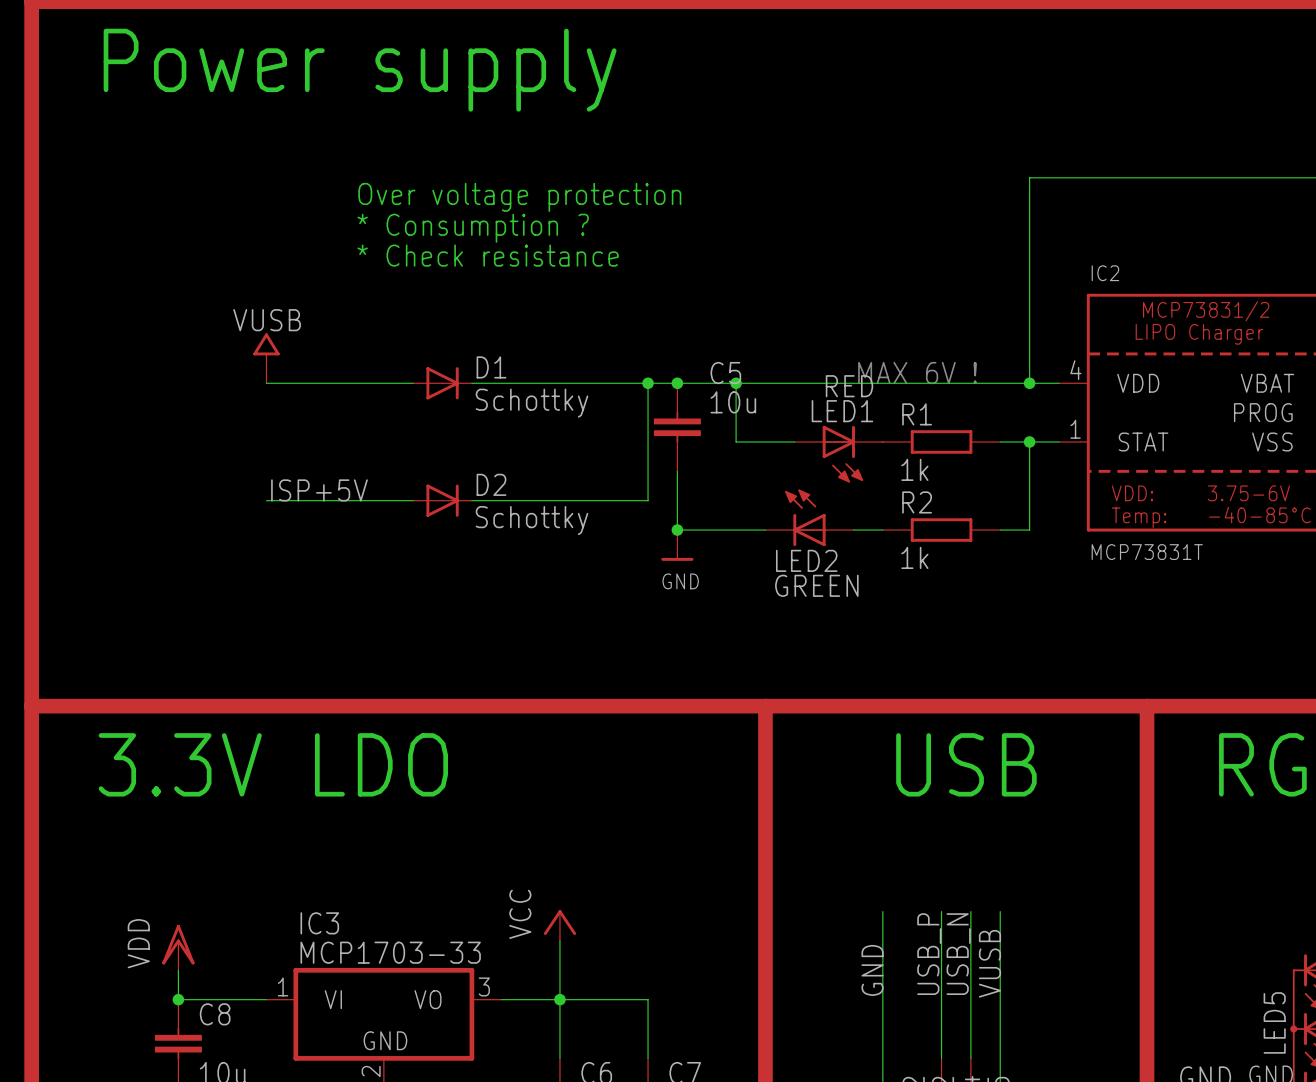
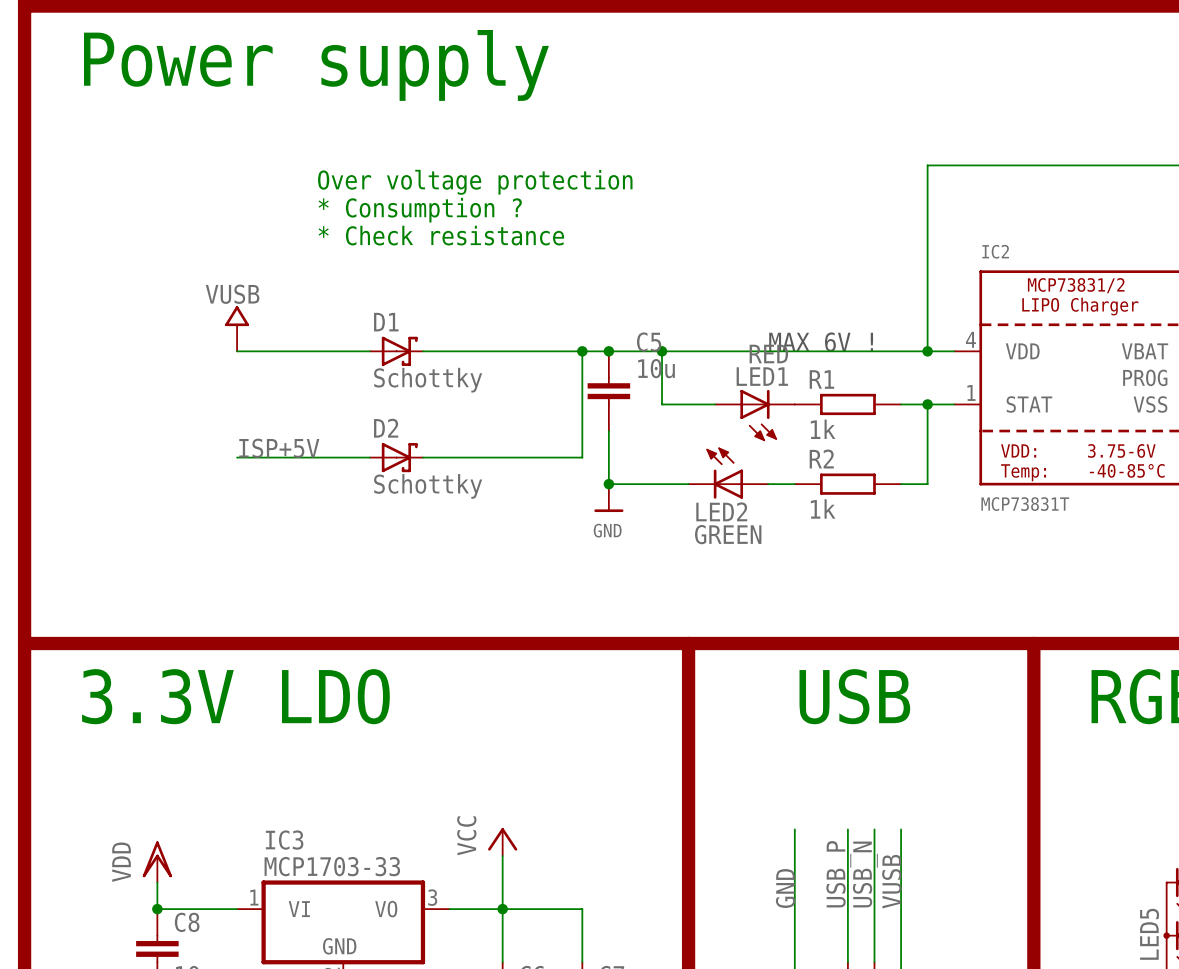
D1 symbol: [413, 367, 472, 400] -> [369, 336, 423, 366]
D1 name position: D1 (491, 367) -> D1 (386, 322)
D1 value position: Schottky (532, 403) -> Schottky (428, 380)
D2 symbol: [413, 484, 472, 517] -> [369, 442, 423, 473]
D2 name position: D2 (491, 484) -> D2 (386, 428)
D2 value position: Schottky (532, 520) -> Schottky (428, 486)

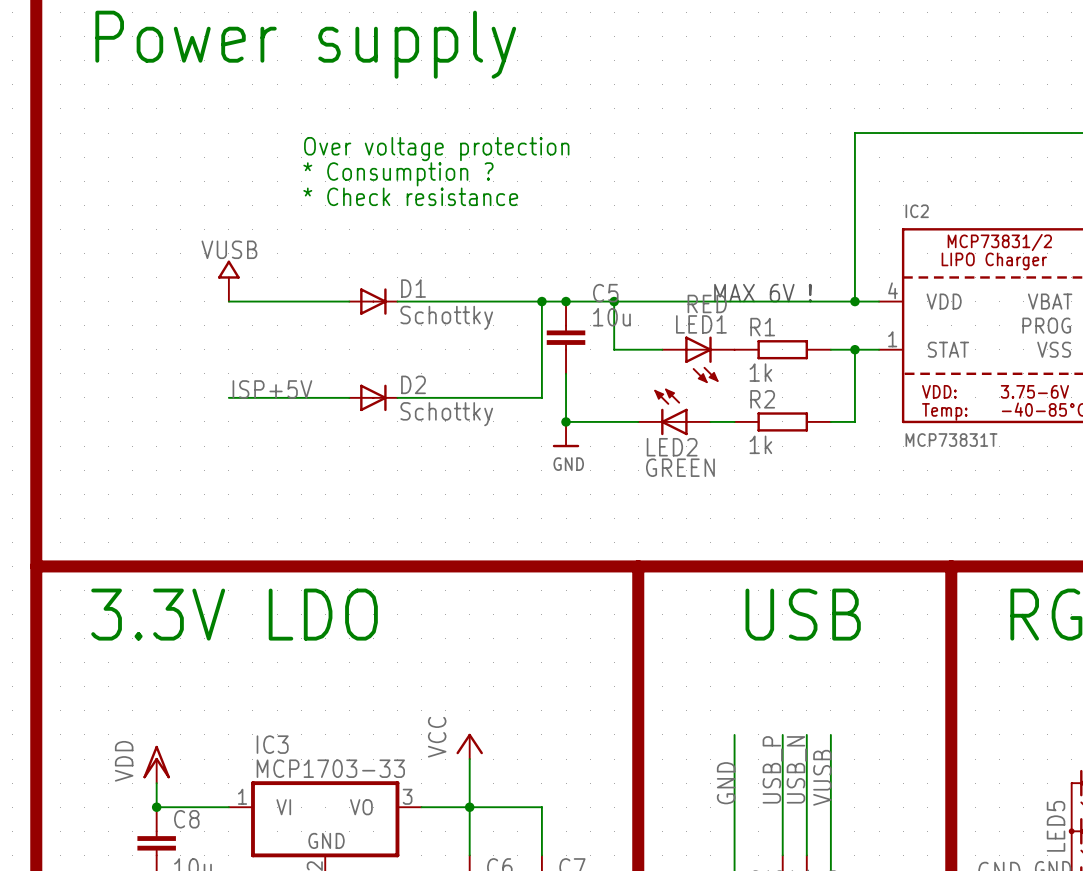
D1 name position: D1 (386, 322) -> D1 (413, 288)
D1 symbol: [369, 336, 423, 366] -> [349, 288, 398, 315]
D1 value position: Schottky (428, 380) -> Schottky (446, 317)
D2 name position: D2 (386, 428) -> D2 (413, 384)
D2 symbol: [369, 442, 423, 473] -> [349, 384, 398, 412]
D2 value position: Schottky (428, 486) -> Schottky (446, 414)

